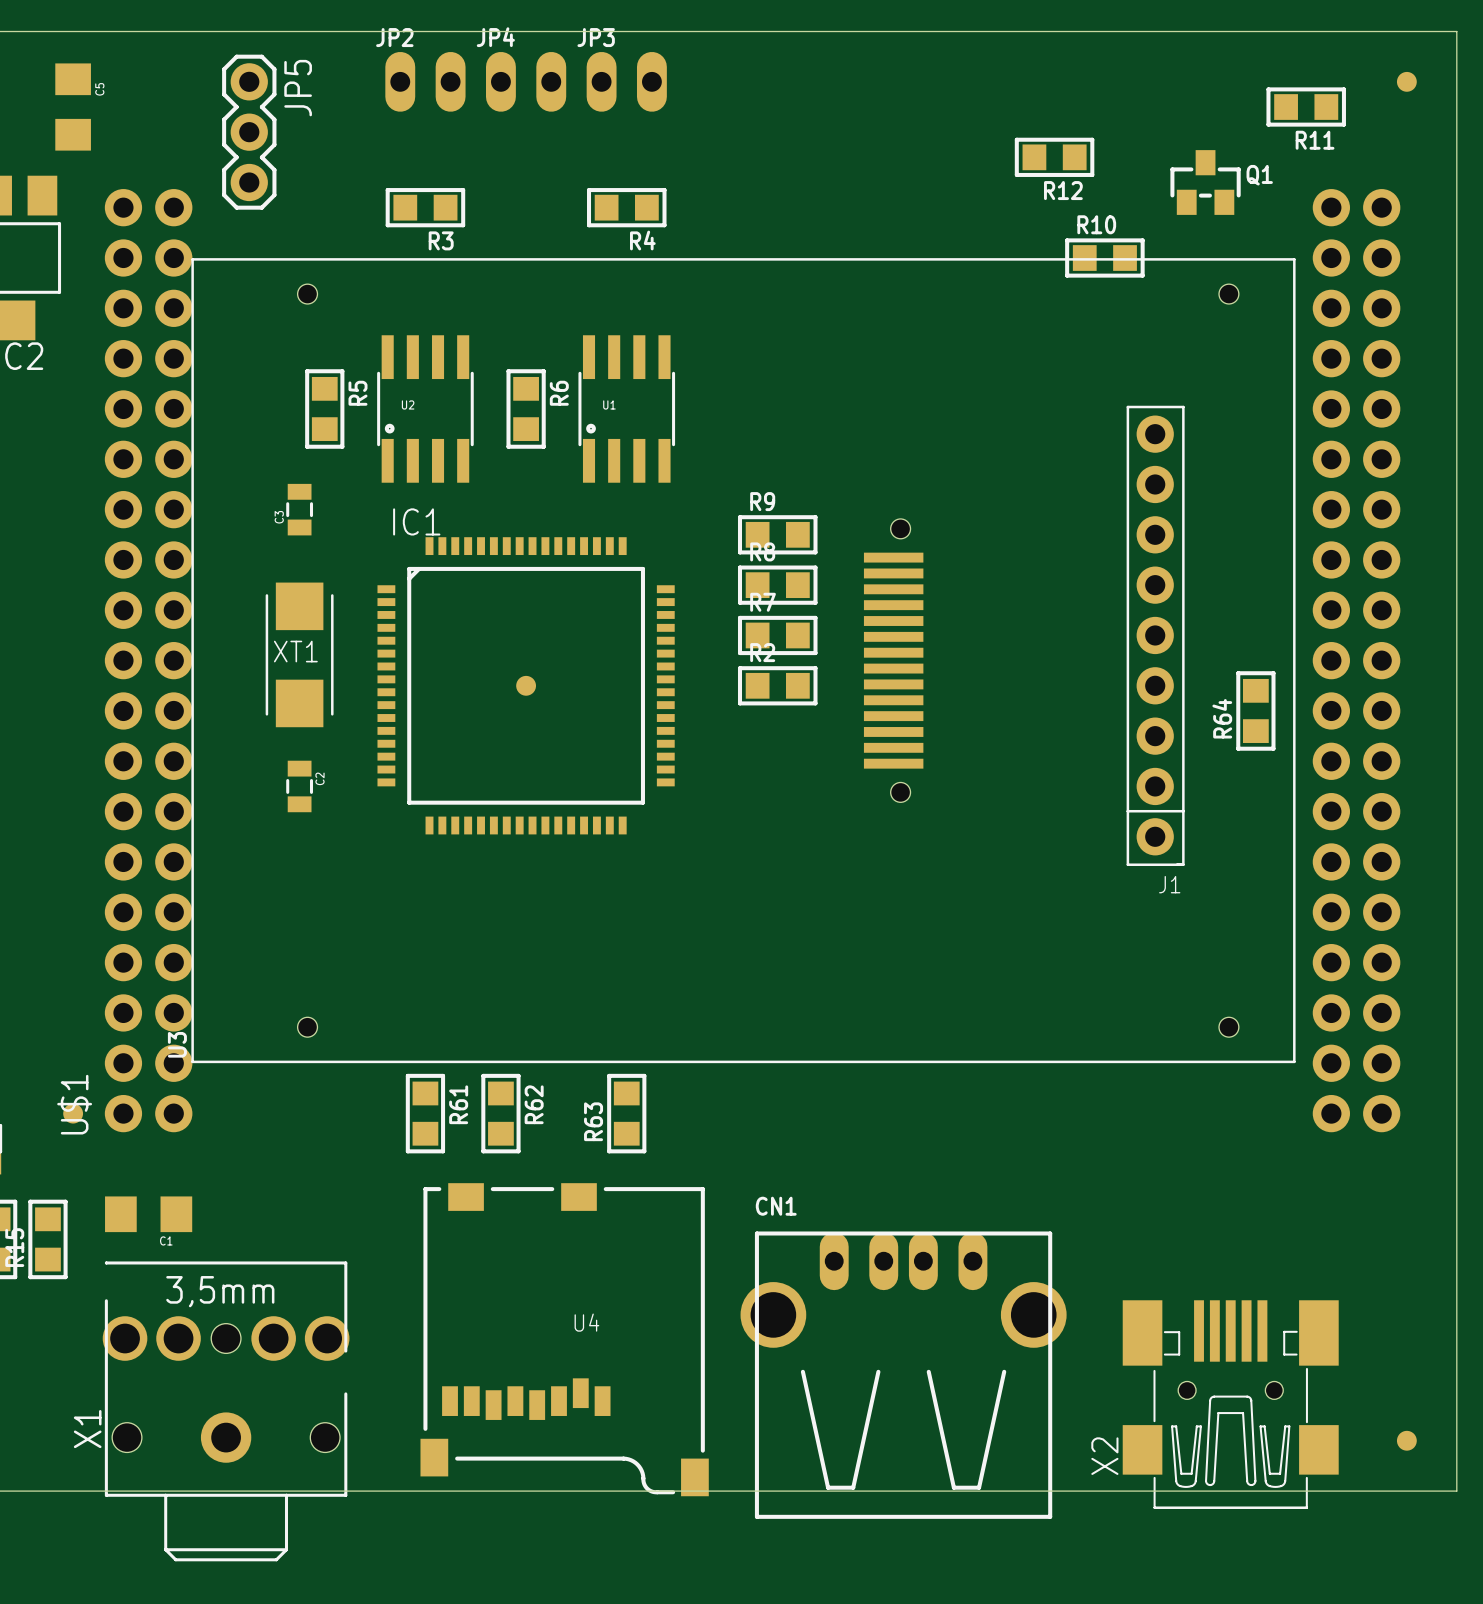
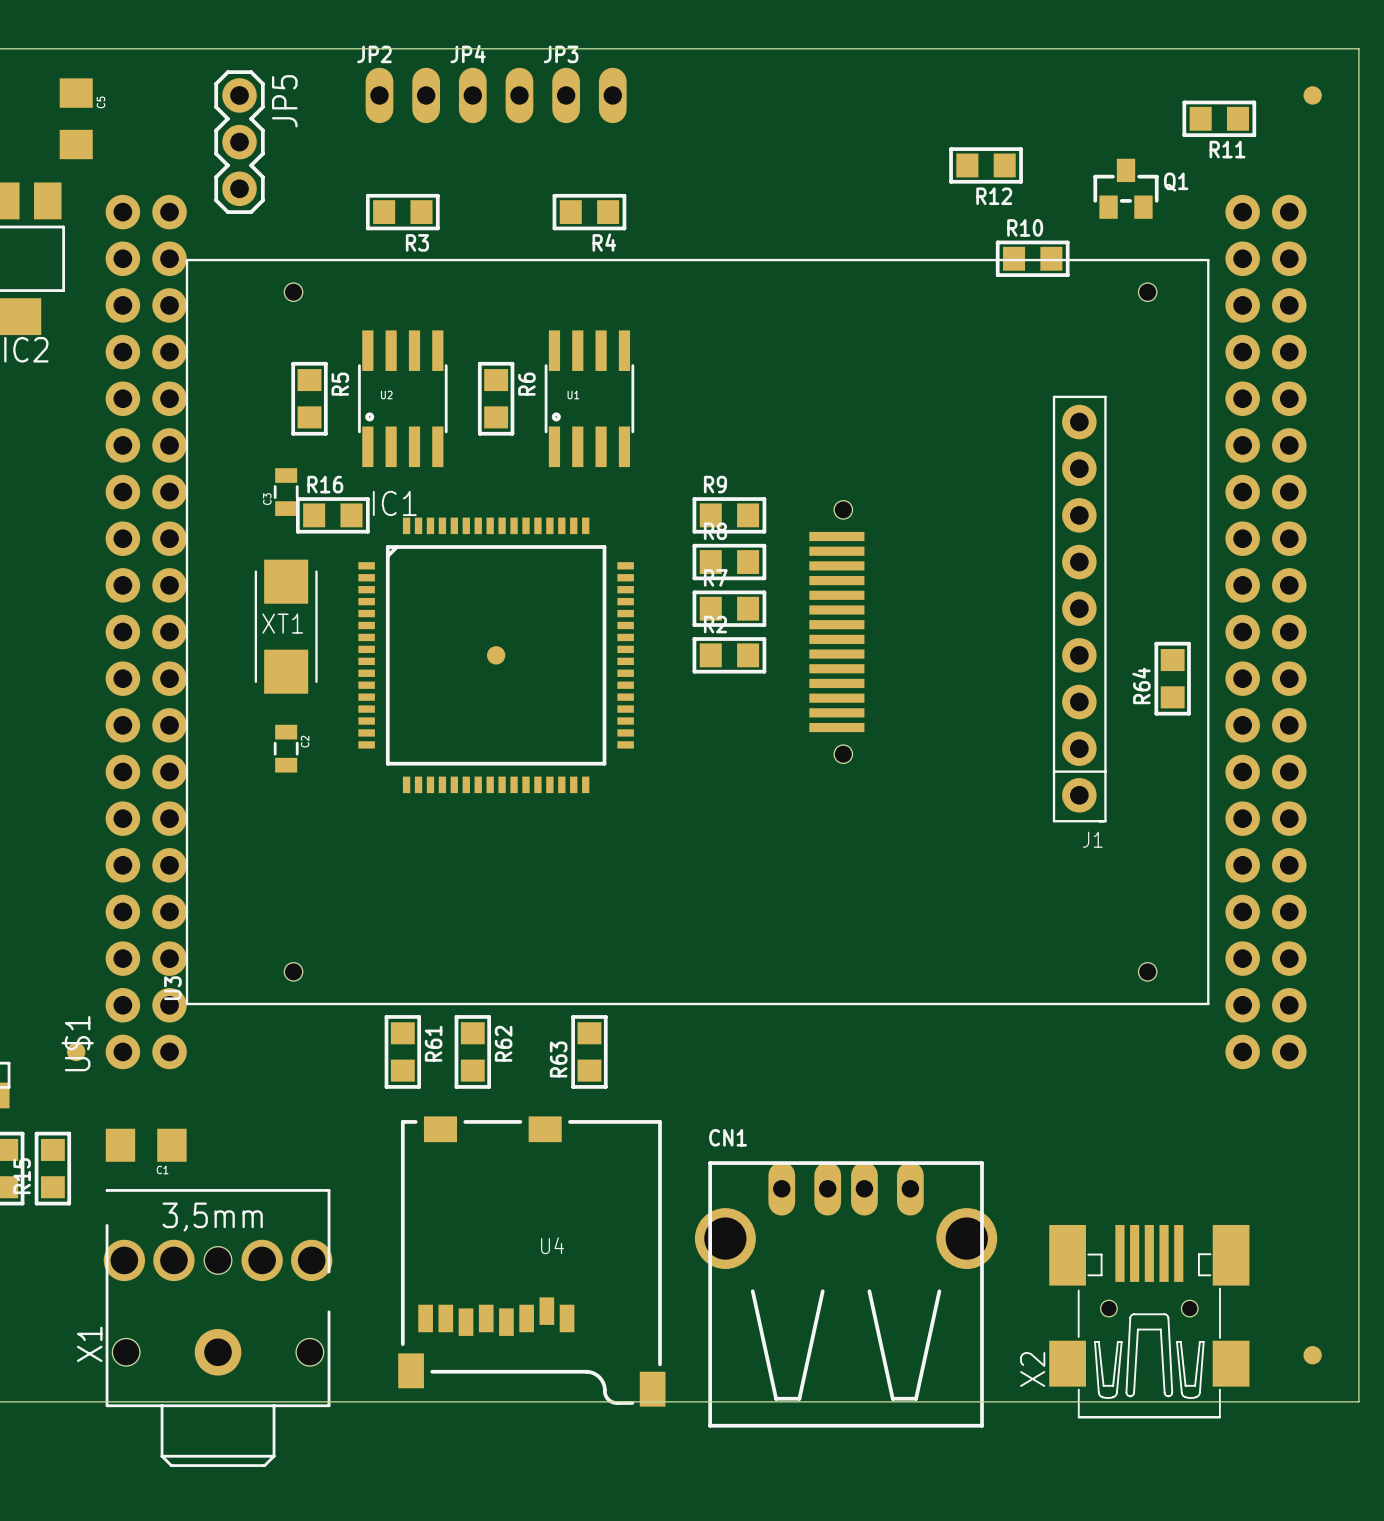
R16: none -> (332, 515)

